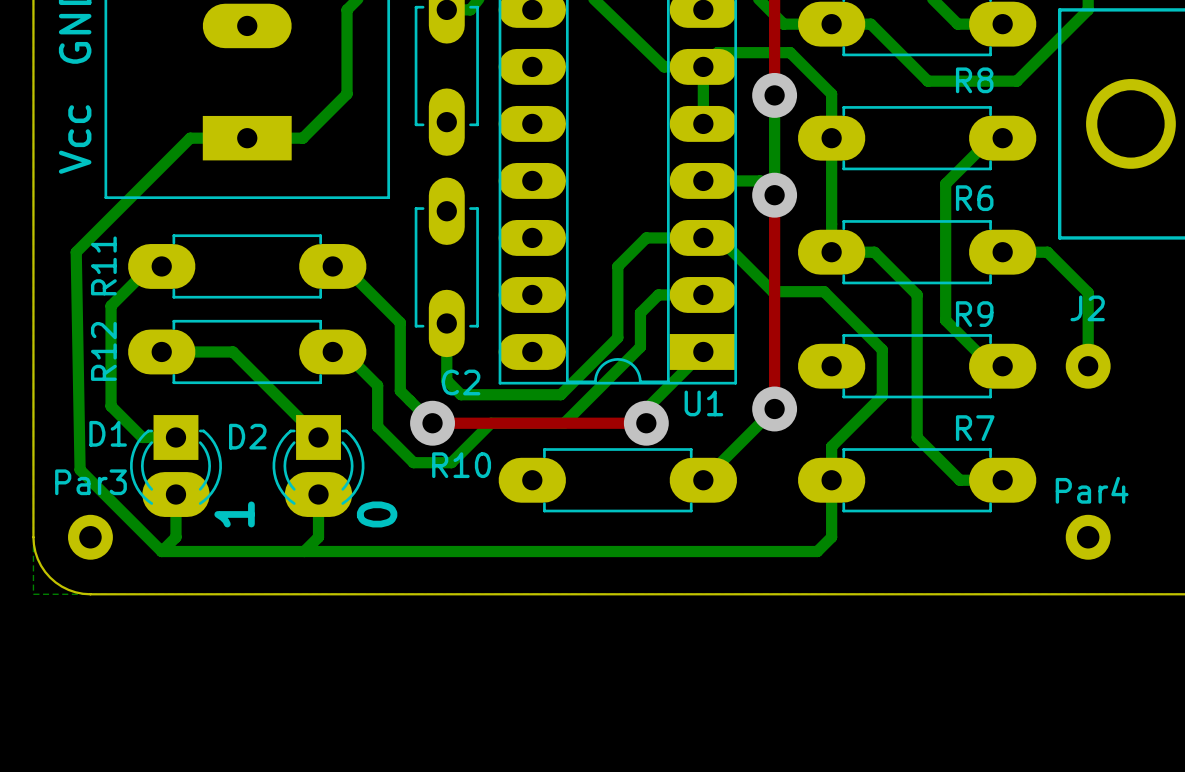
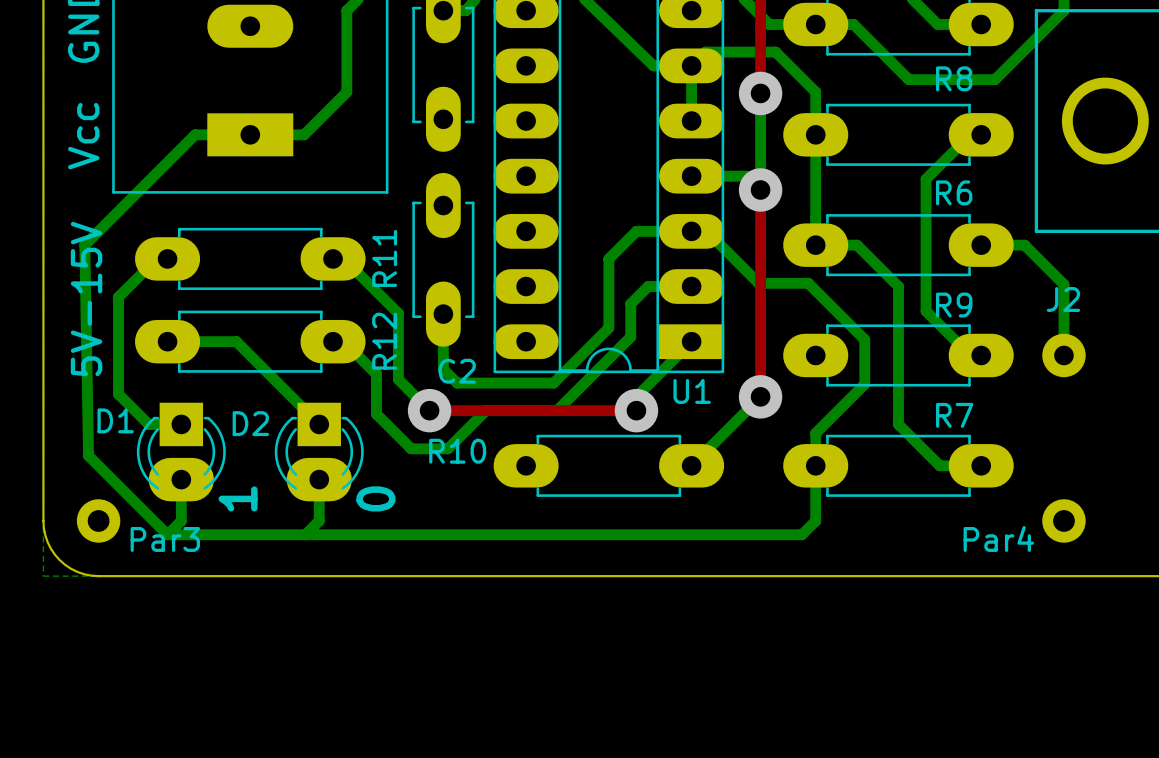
R11 name position: R11 (103, 265) -> R11 (384, 258)
text: none -> 5V-15V (86, 299)
R12 name position: R12 (103, 351) -> R12 (384, 341)
Par3 name position: Par3 (91, 482) -> Par3 (165, 539)
Par4 name position: Par4 (1092, 490) -> Par4 (998, 538)

